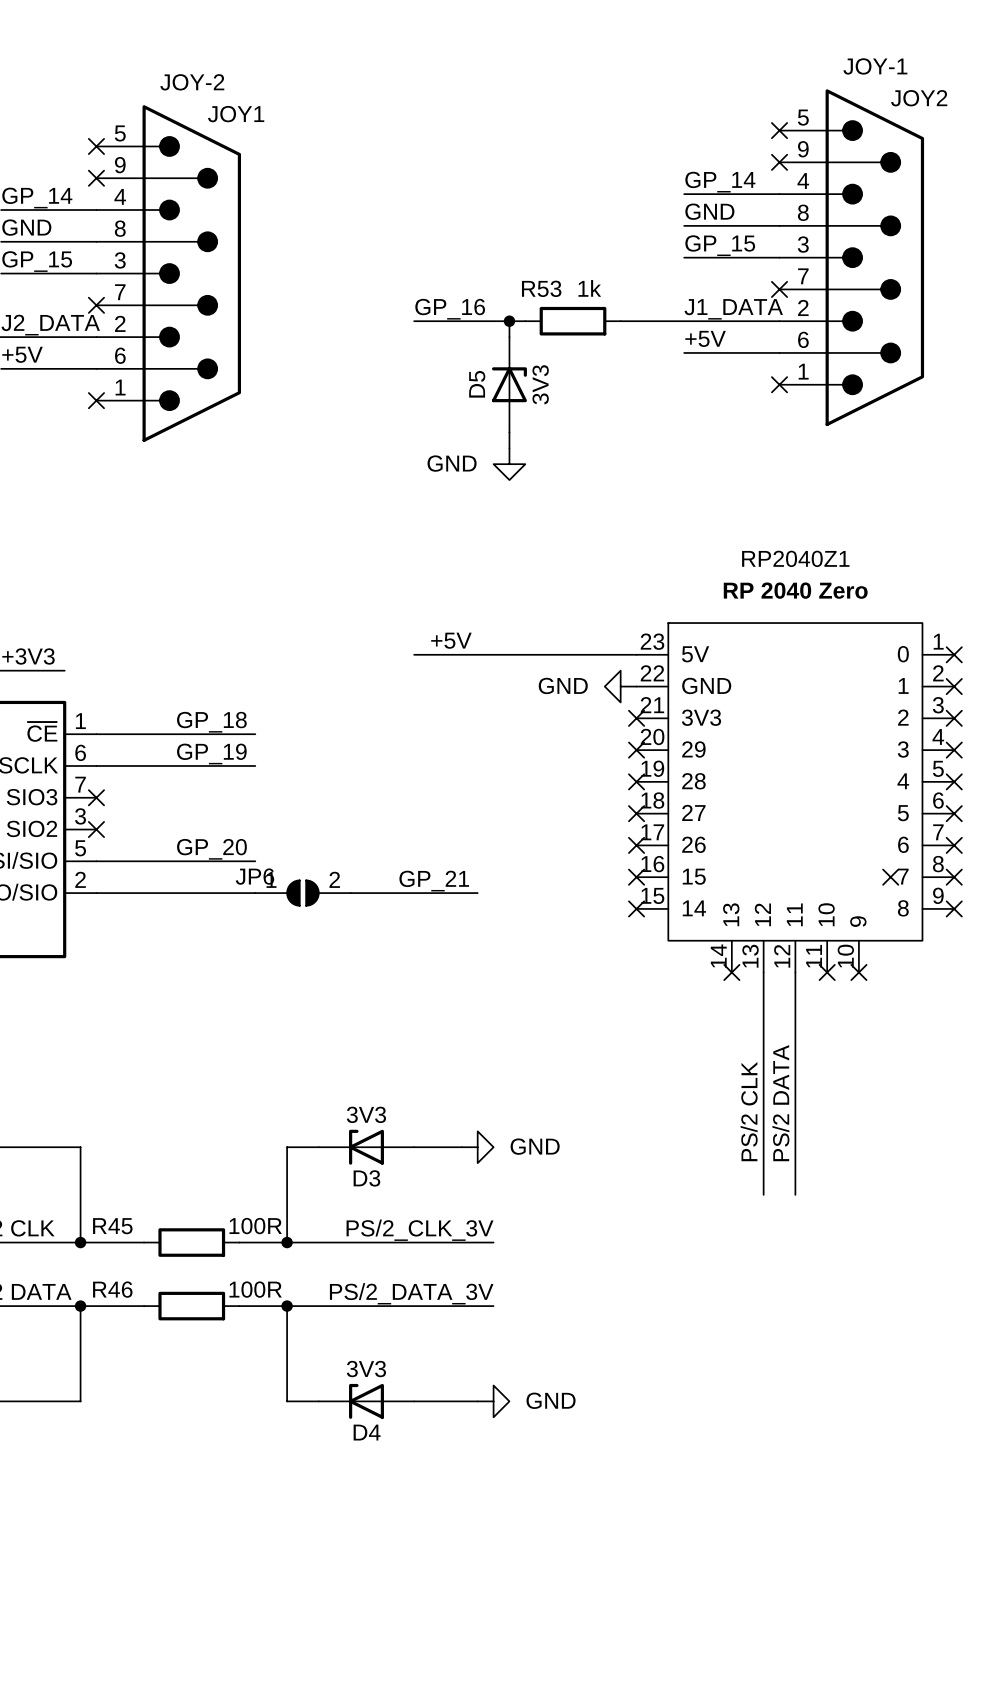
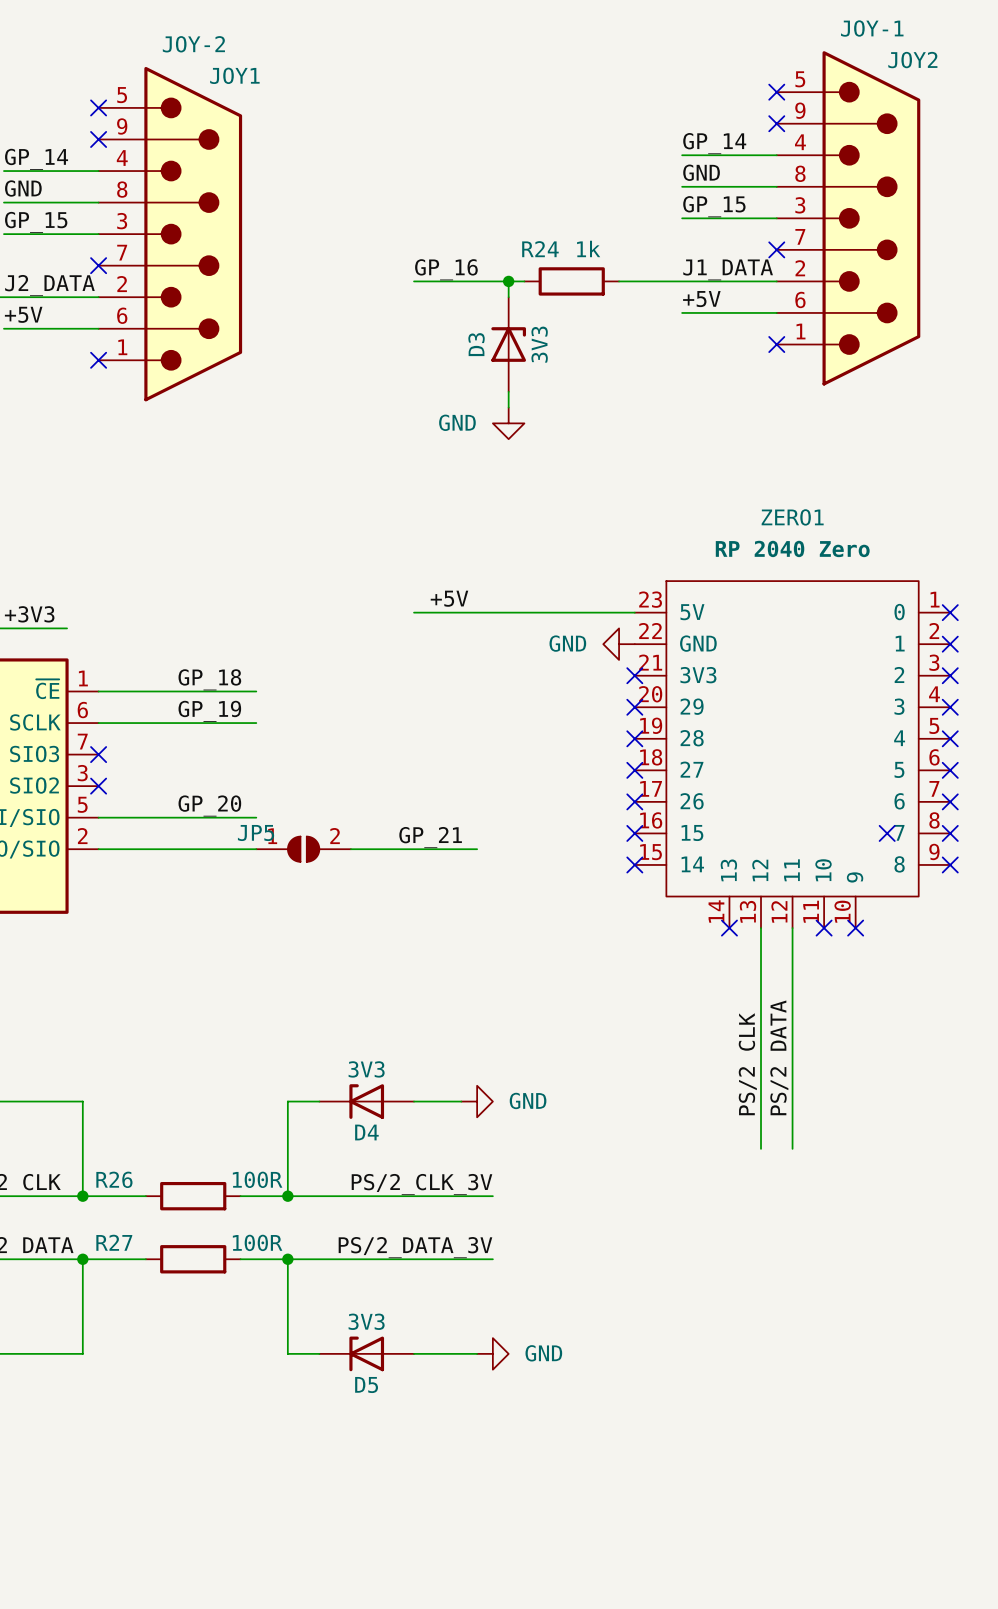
R53 name: R53 (541, 288) -> R24 (540, 249)
D5 name: D5 (477, 384) -> D3 (476, 344)
RP2040Z1 name: RP2040Z1 (795, 558) -> ZERO1 (792, 517)
JP6 name: JP6 (254, 876) -> JP5 (256, 833)
D3 name: D3 (366, 1178) -> D4 (366, 1132)
R45 name: R45 (112, 1226) -> R26 (114, 1179)
R46 name: R46 (112, 1289) -> R27 (114, 1242)
D4 name: D4 (367, 1432) -> D5 (366, 1385)

